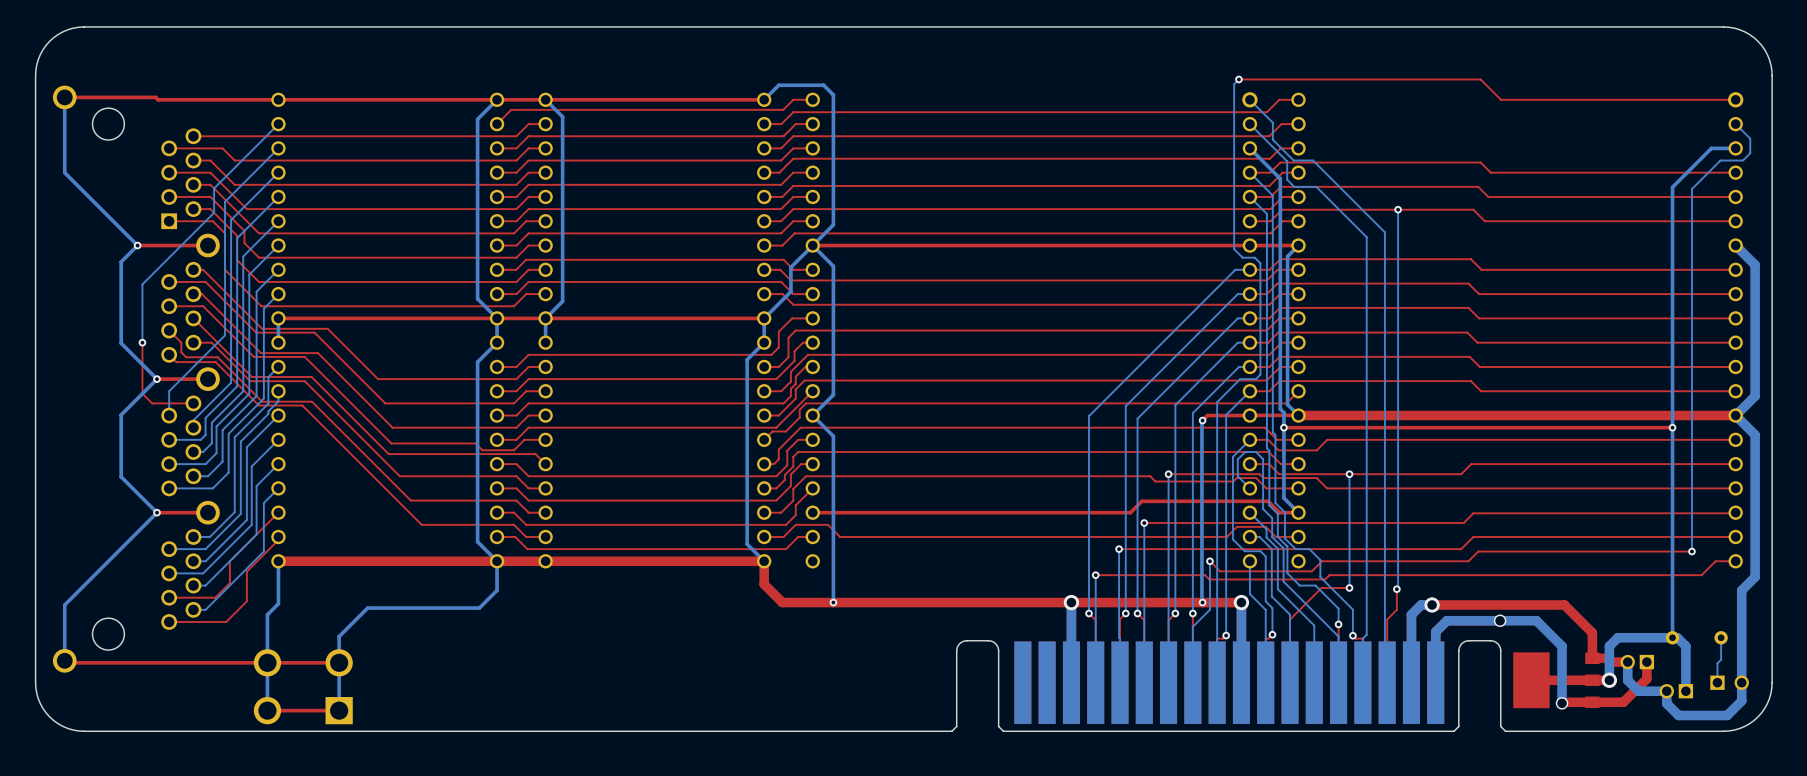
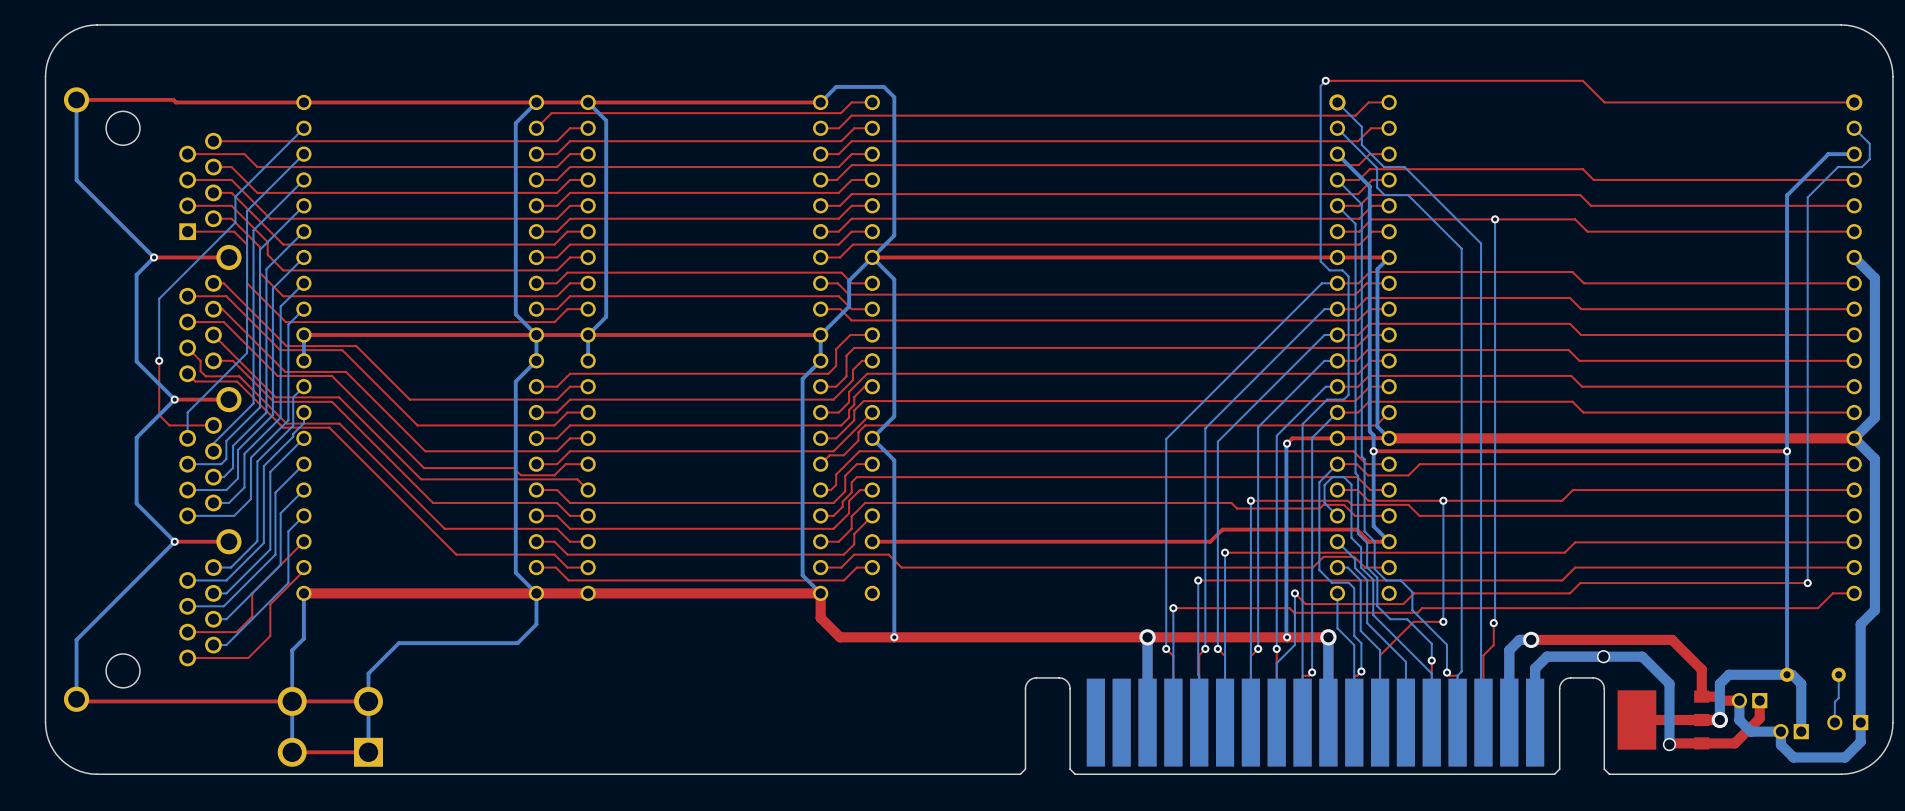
part rotation: 0° (1729, 682) -> 180° (1847, 722)

